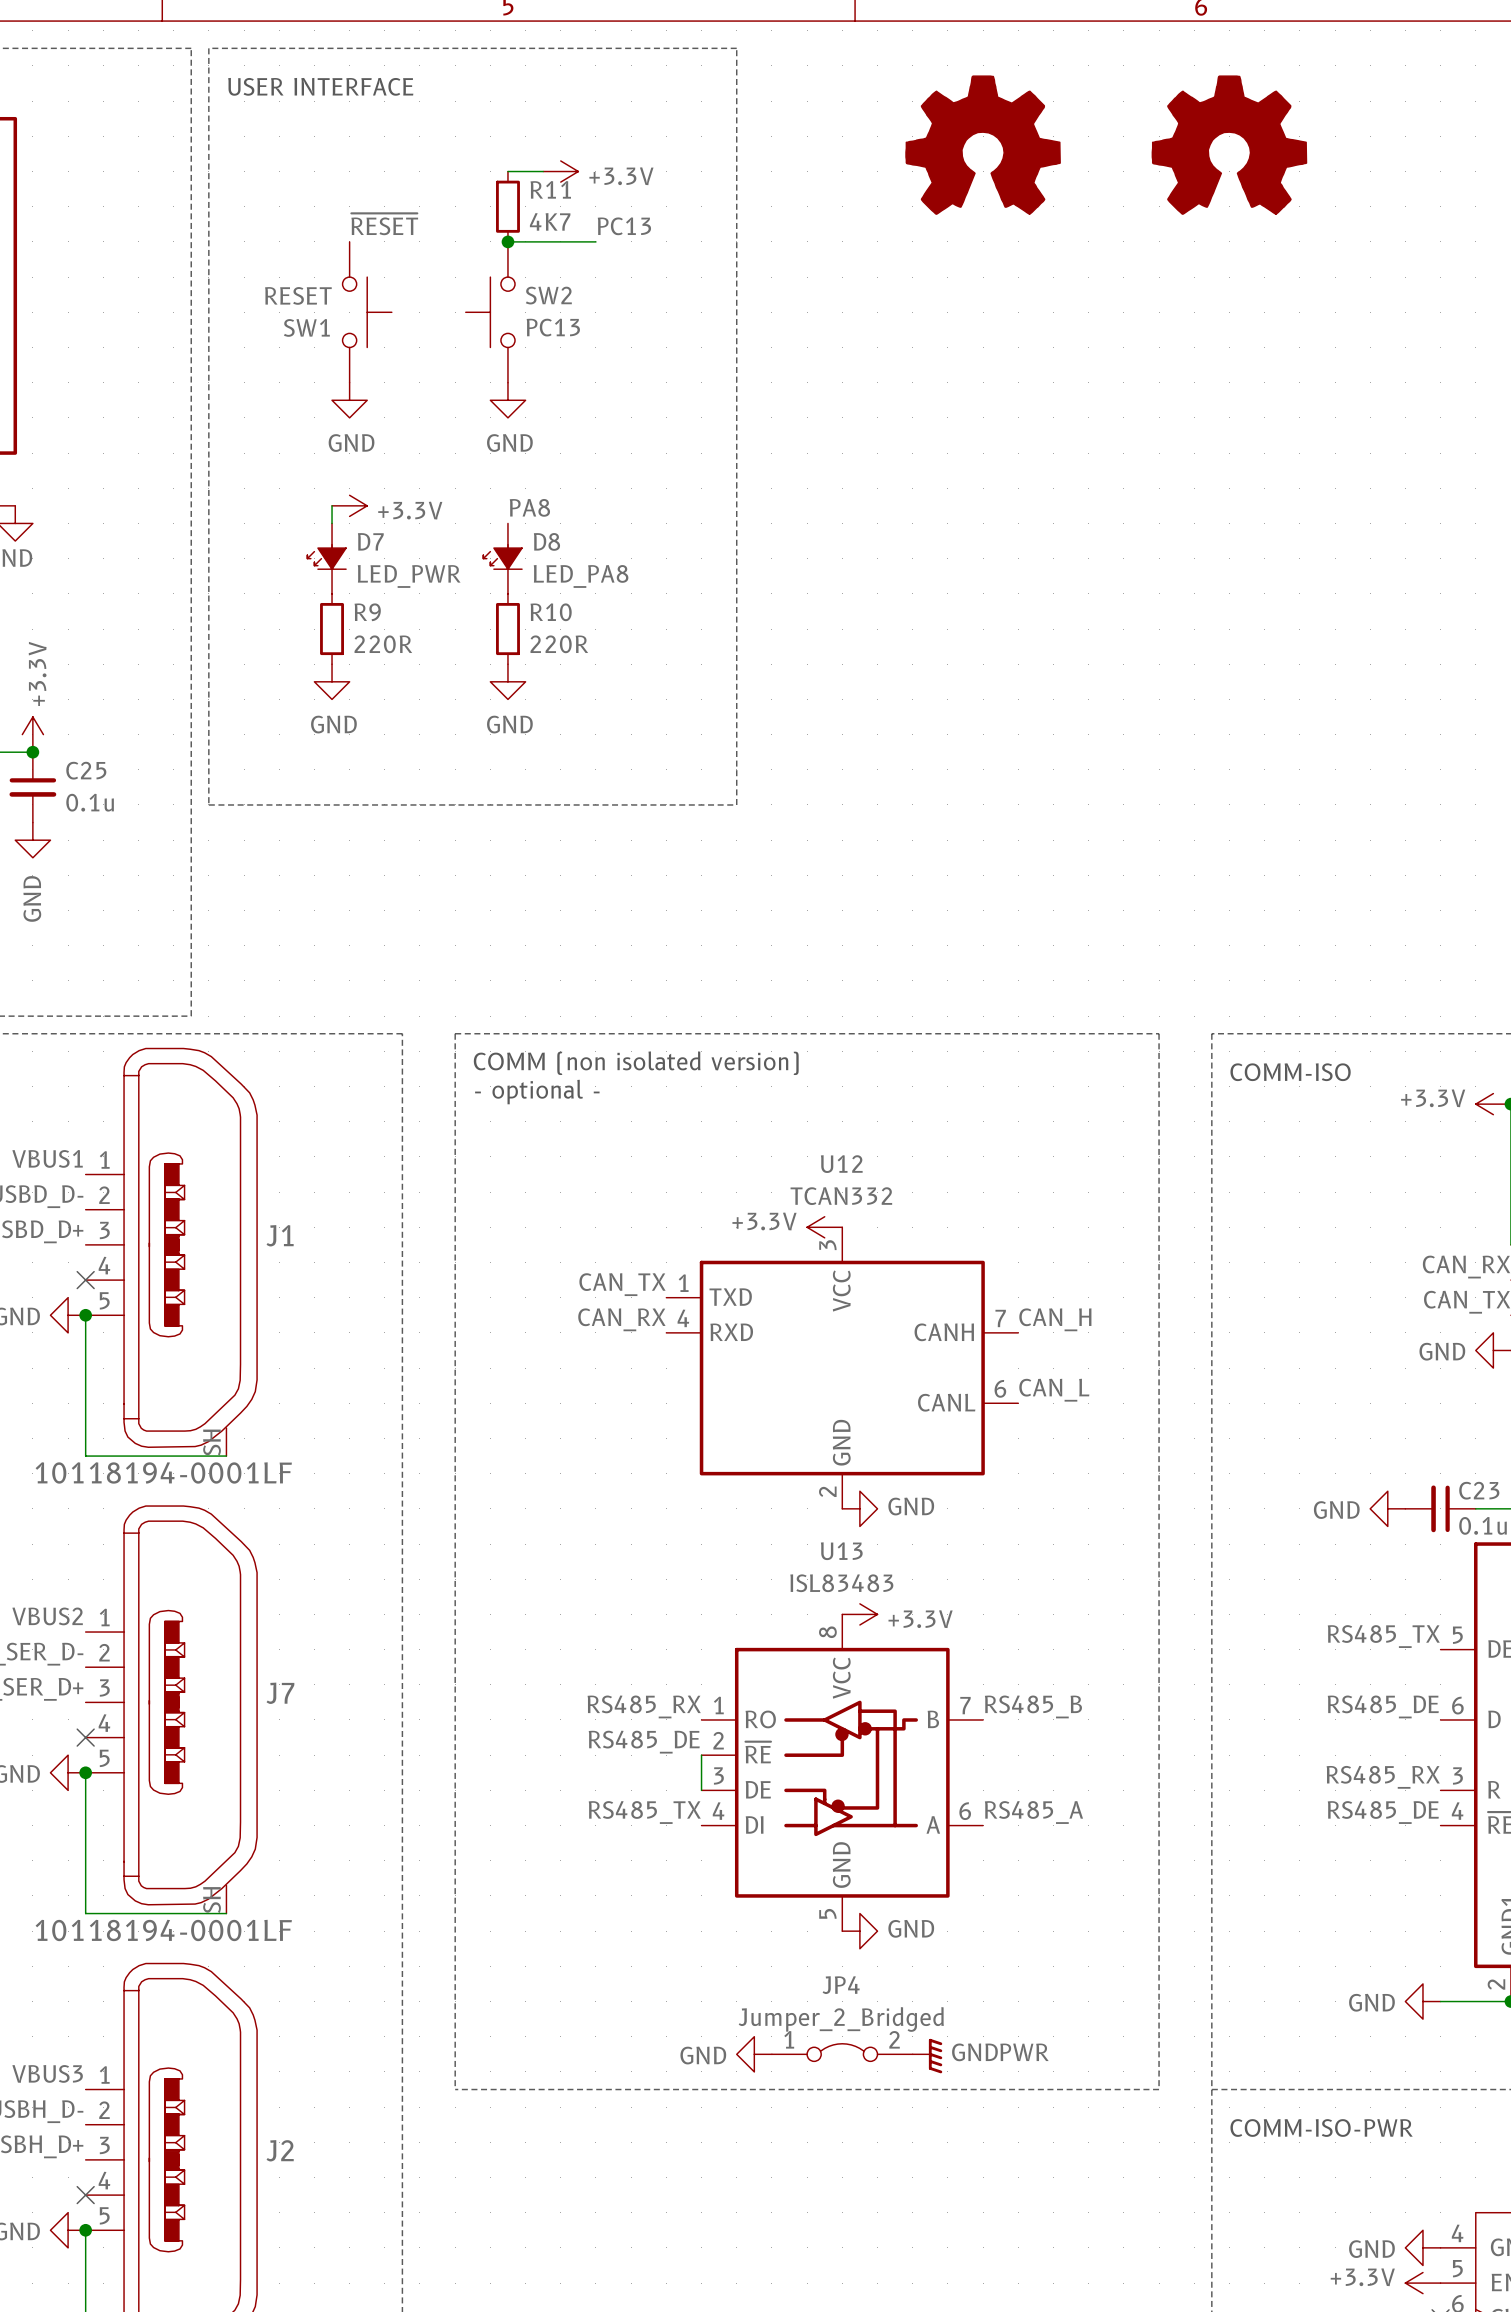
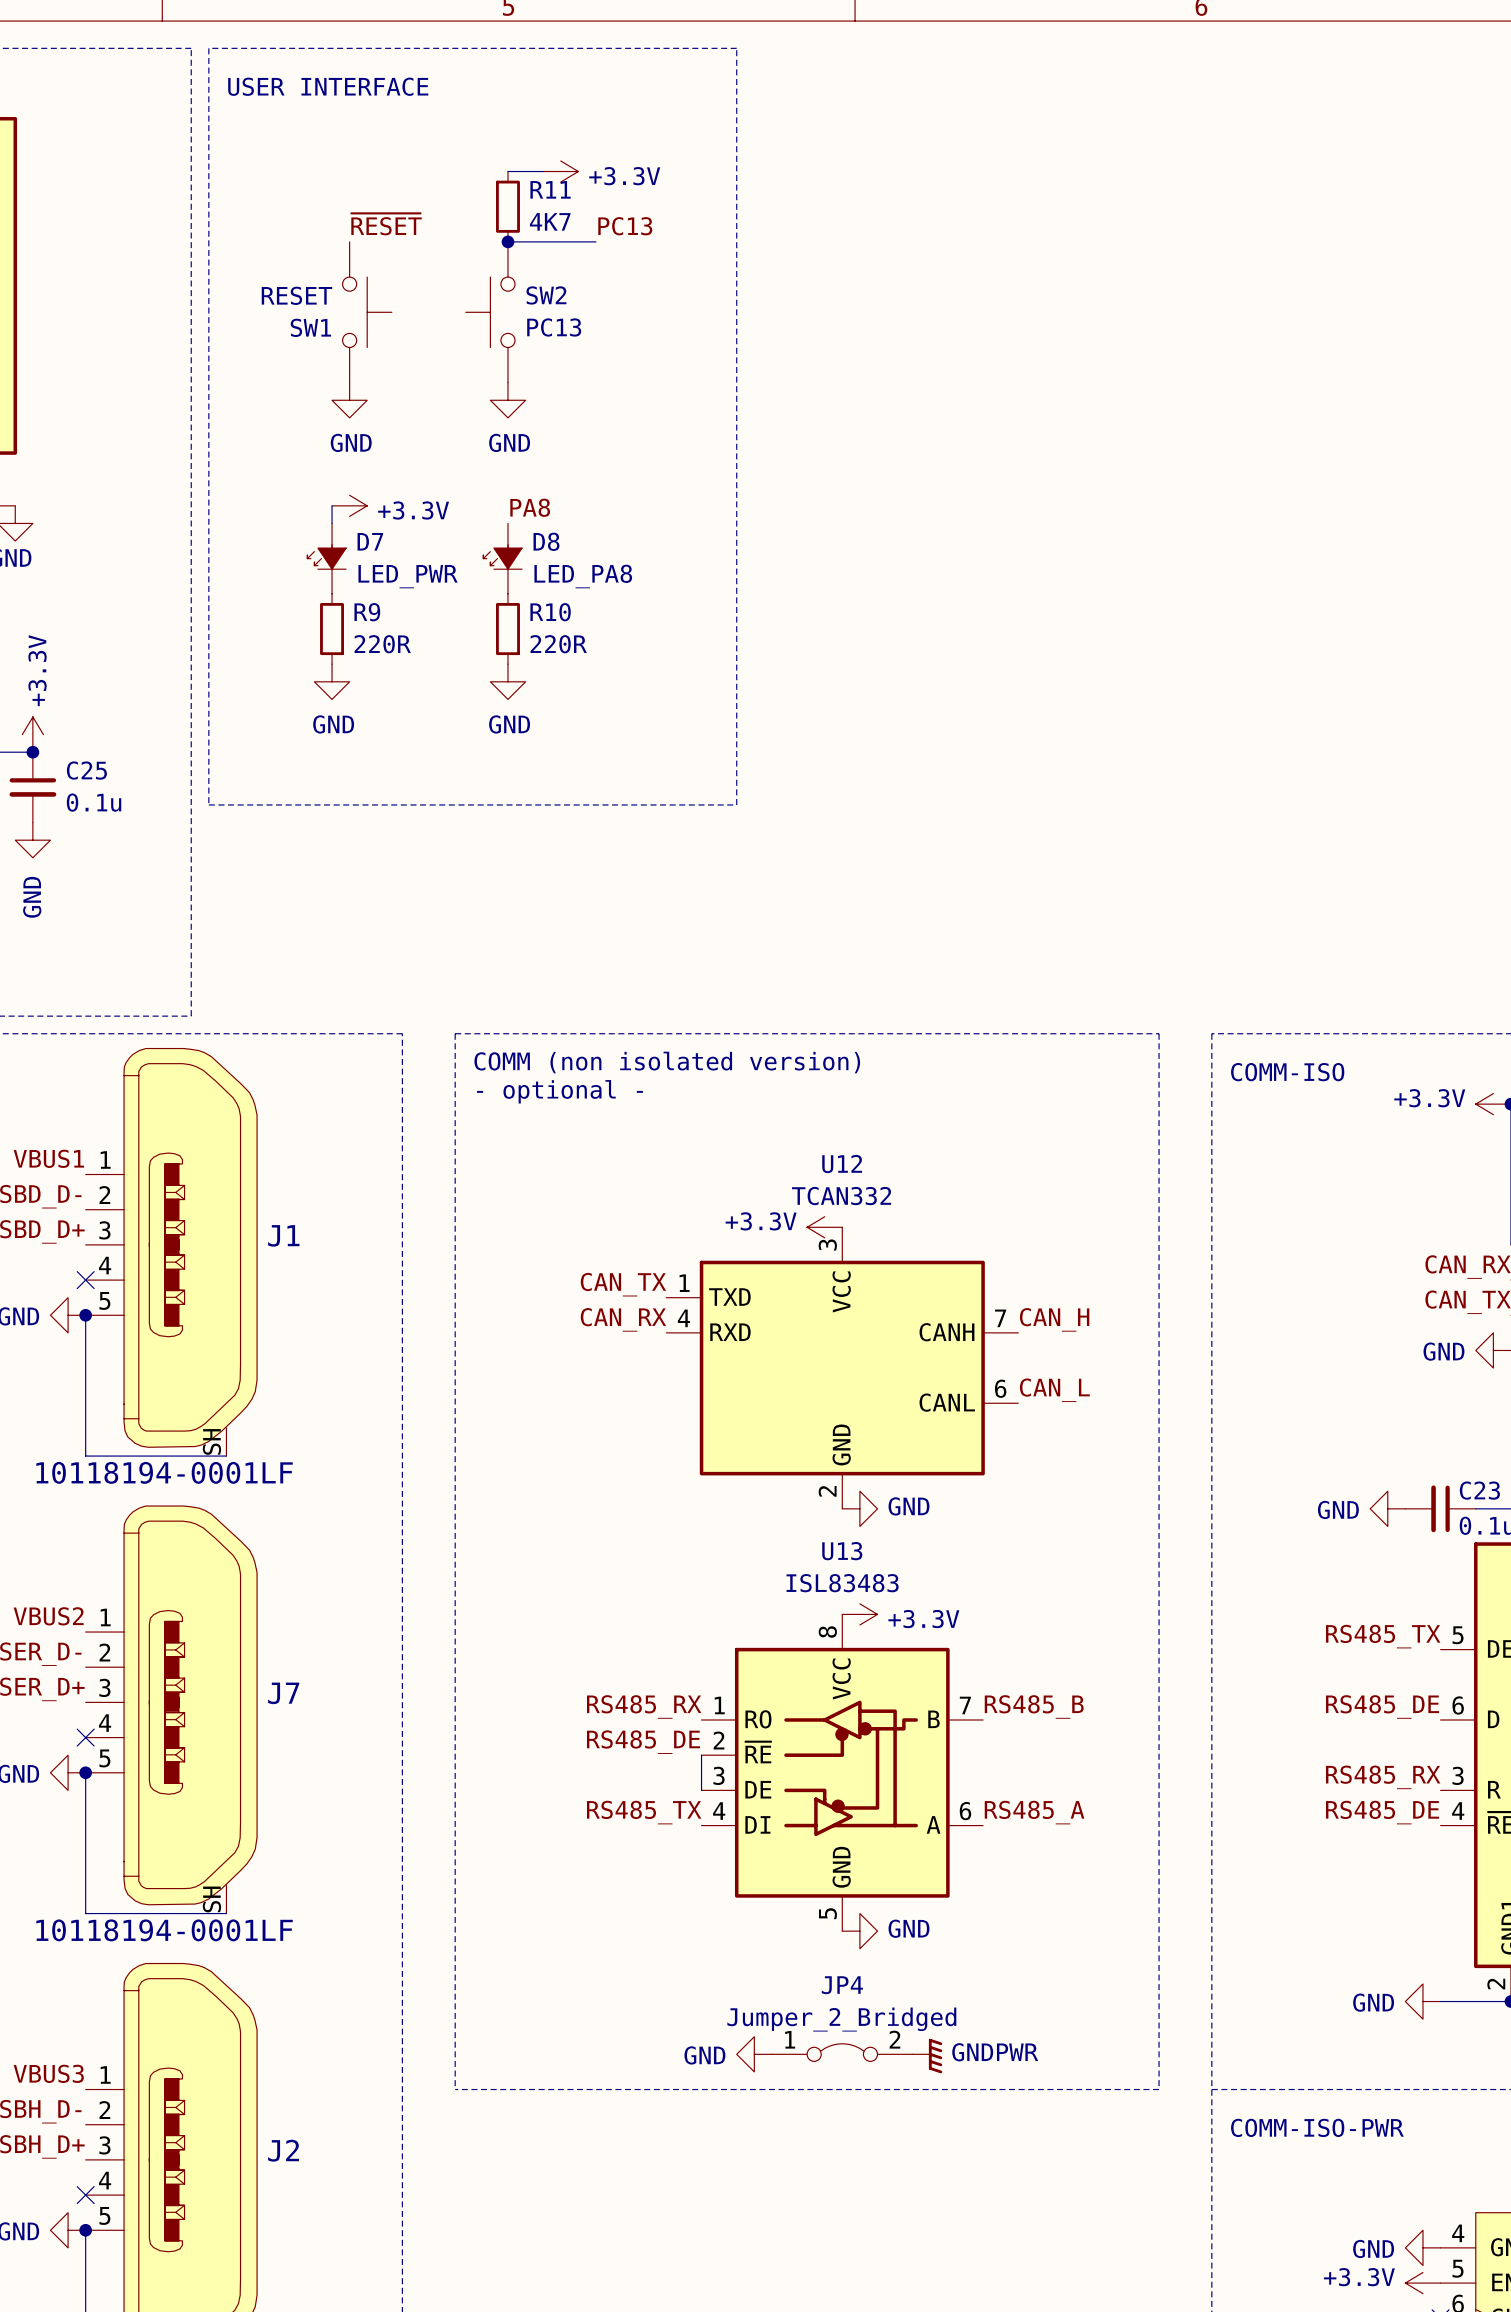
power symbol: (983, 145) -> none
power symbol: (1229, 145) -> none

